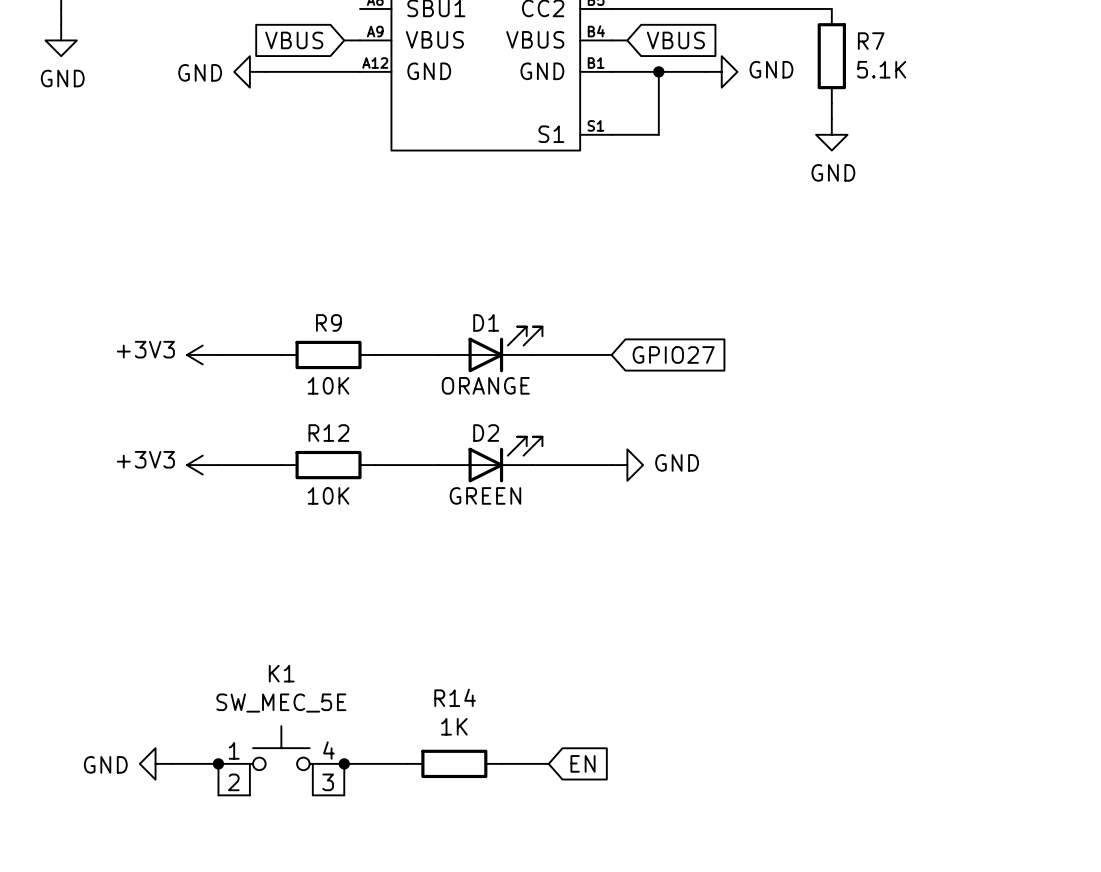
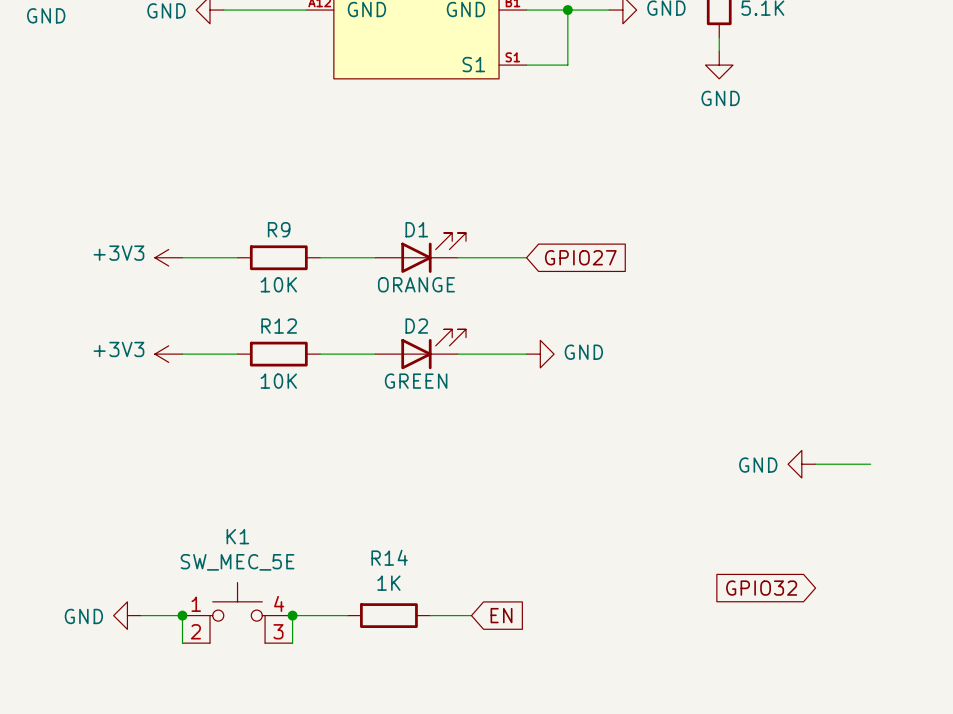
power symbol: none -> GND (801, 464)
wire: none -> (815, 464) (870, 464)
global label: none -> GPIO32 (761, 588)

